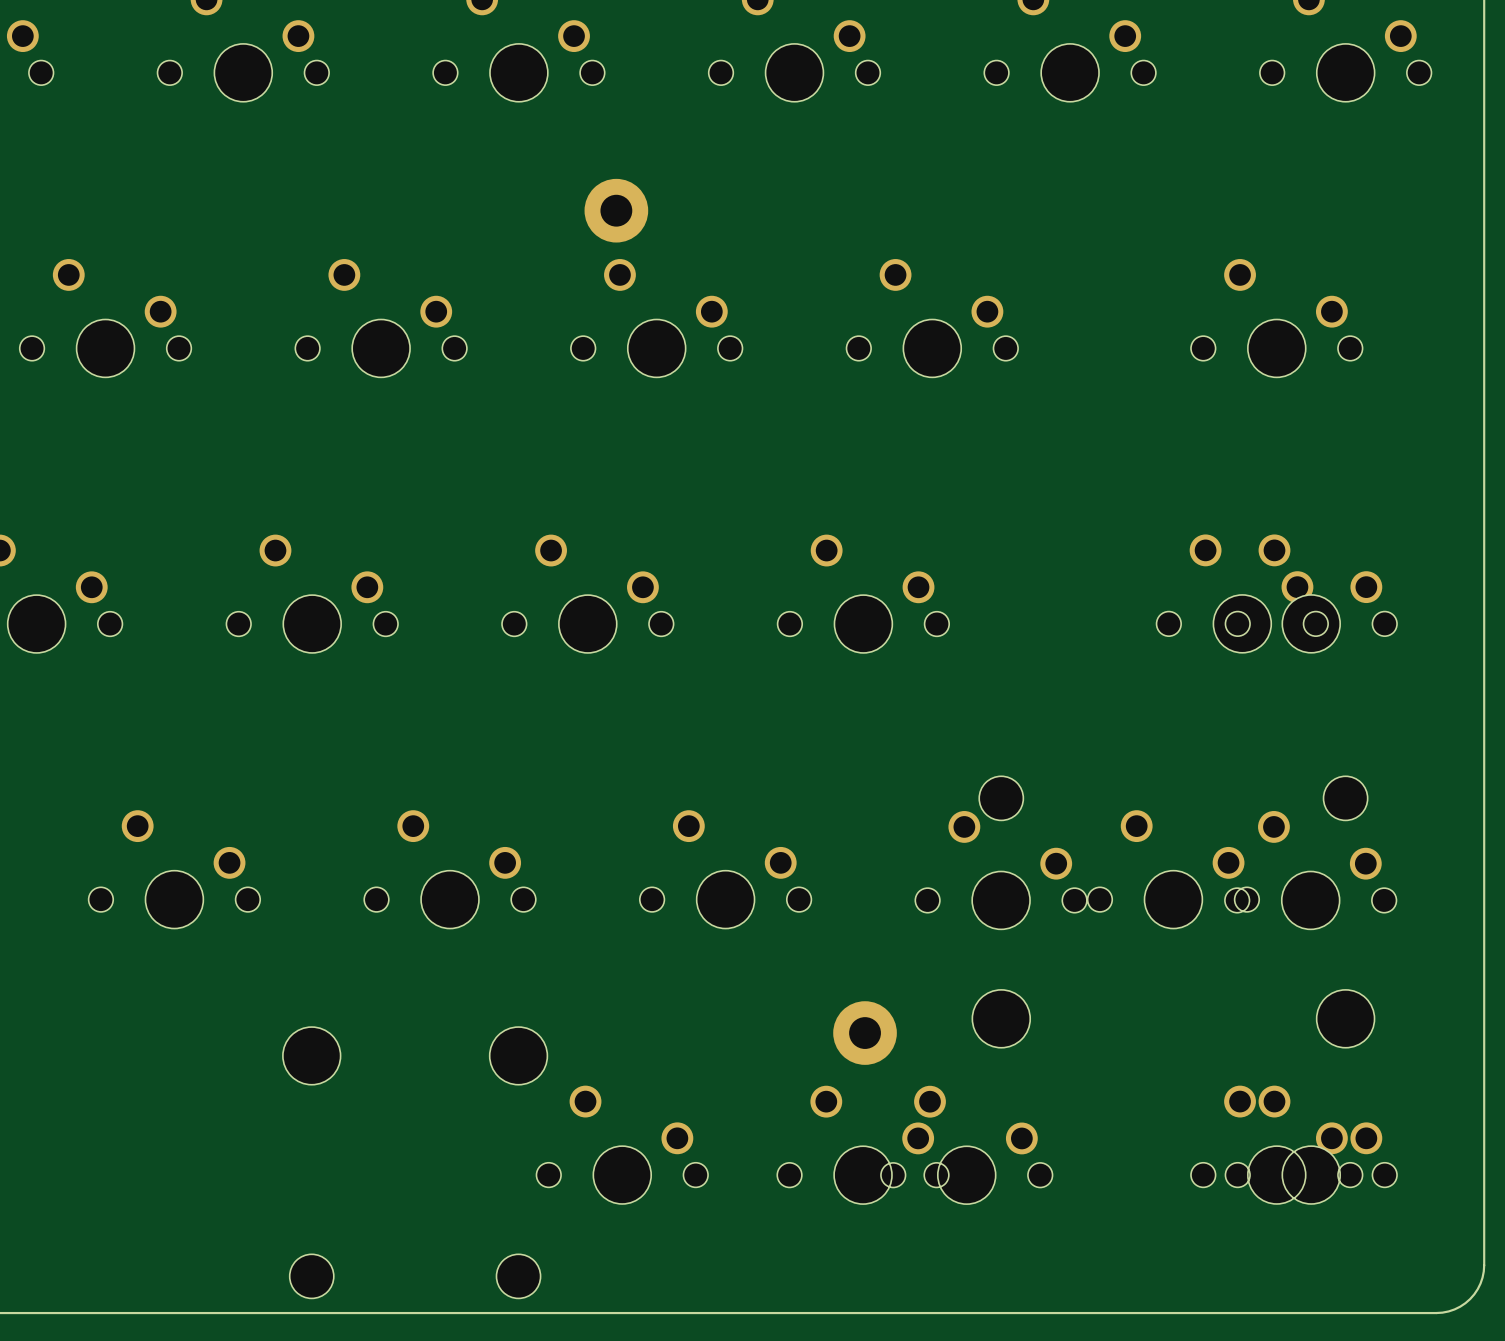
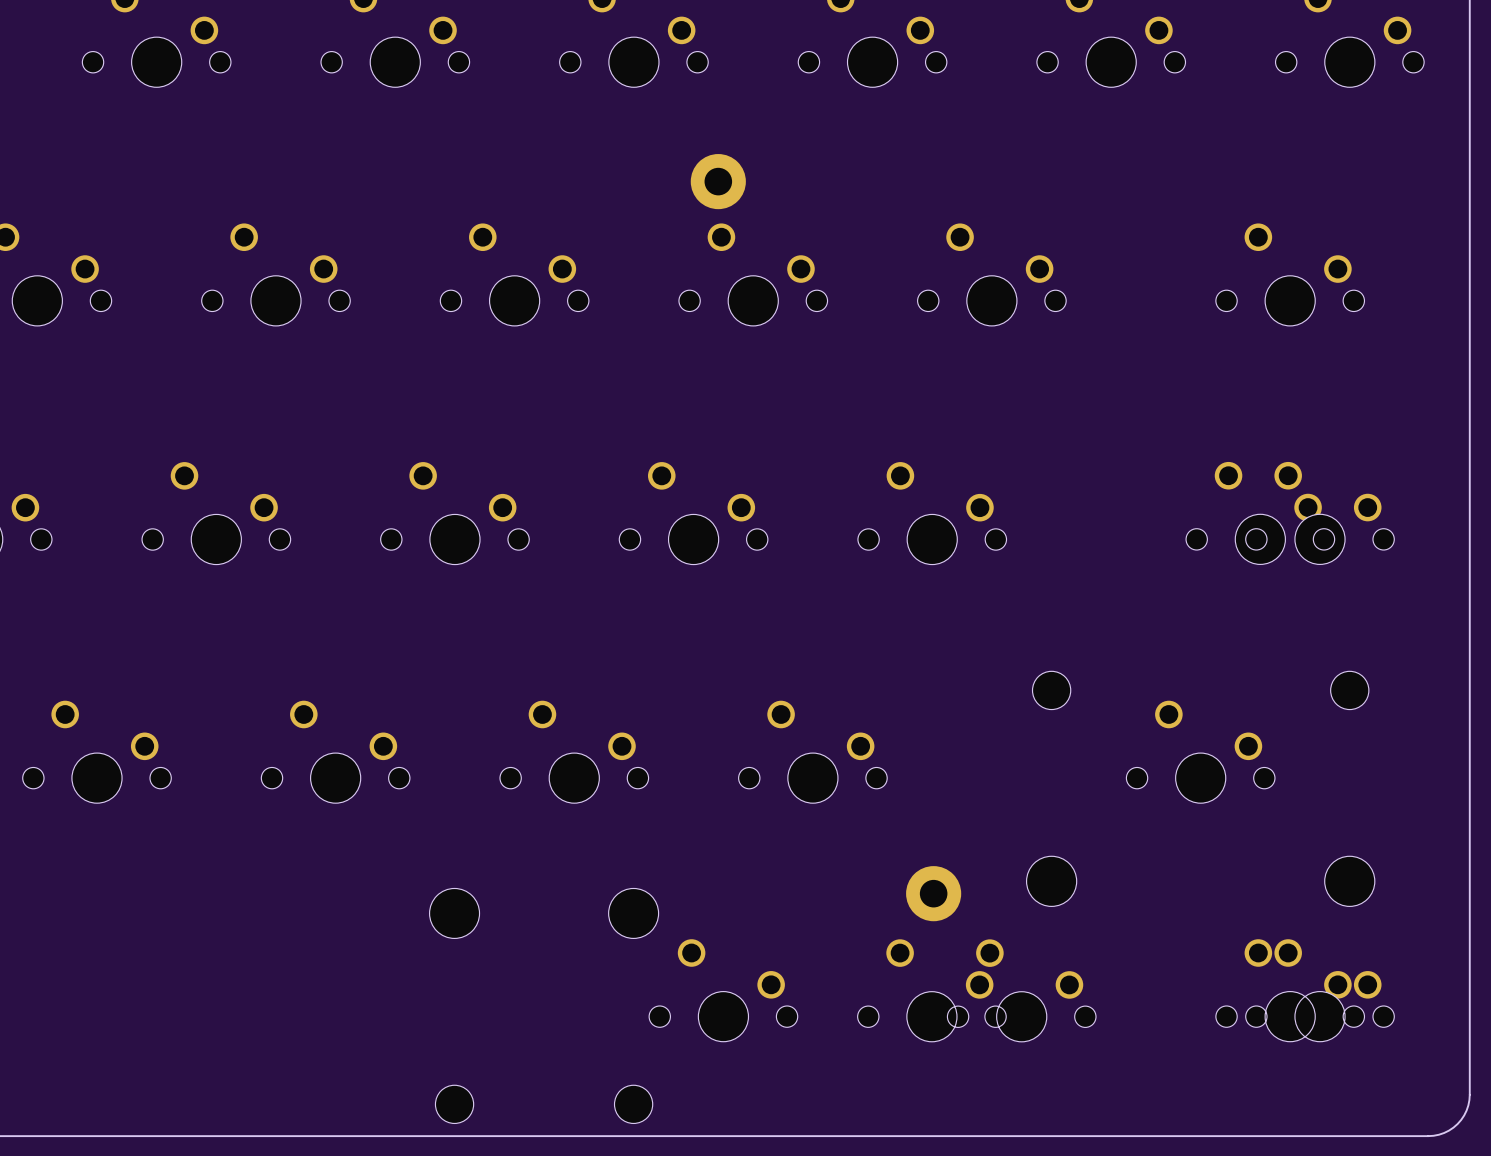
part: (1001, 870) -> none
part: (1310, 870) -> none

